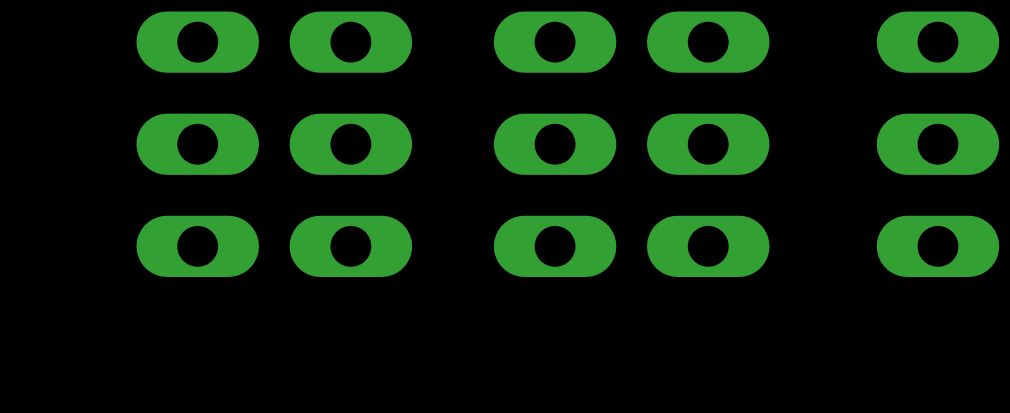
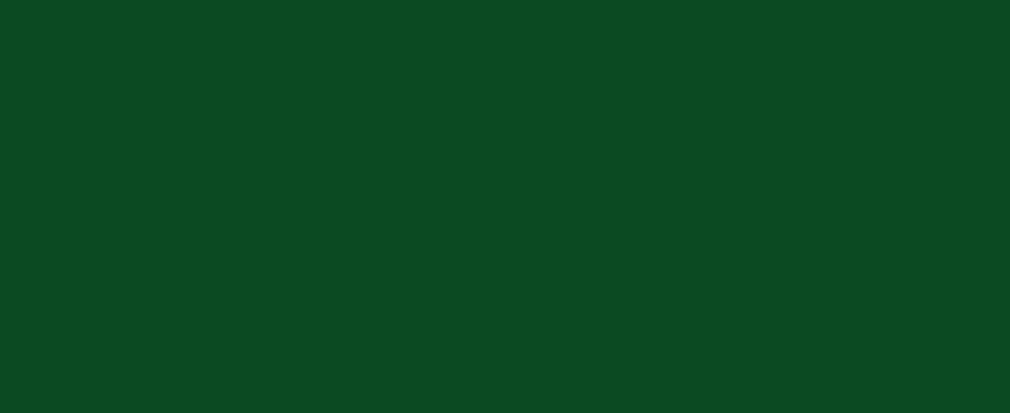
part: (197, 144) -> none
part: (350, 144) -> none
part: (555, 144) -> none
part: (708, 144) -> none
part: (937, 144) -> none

